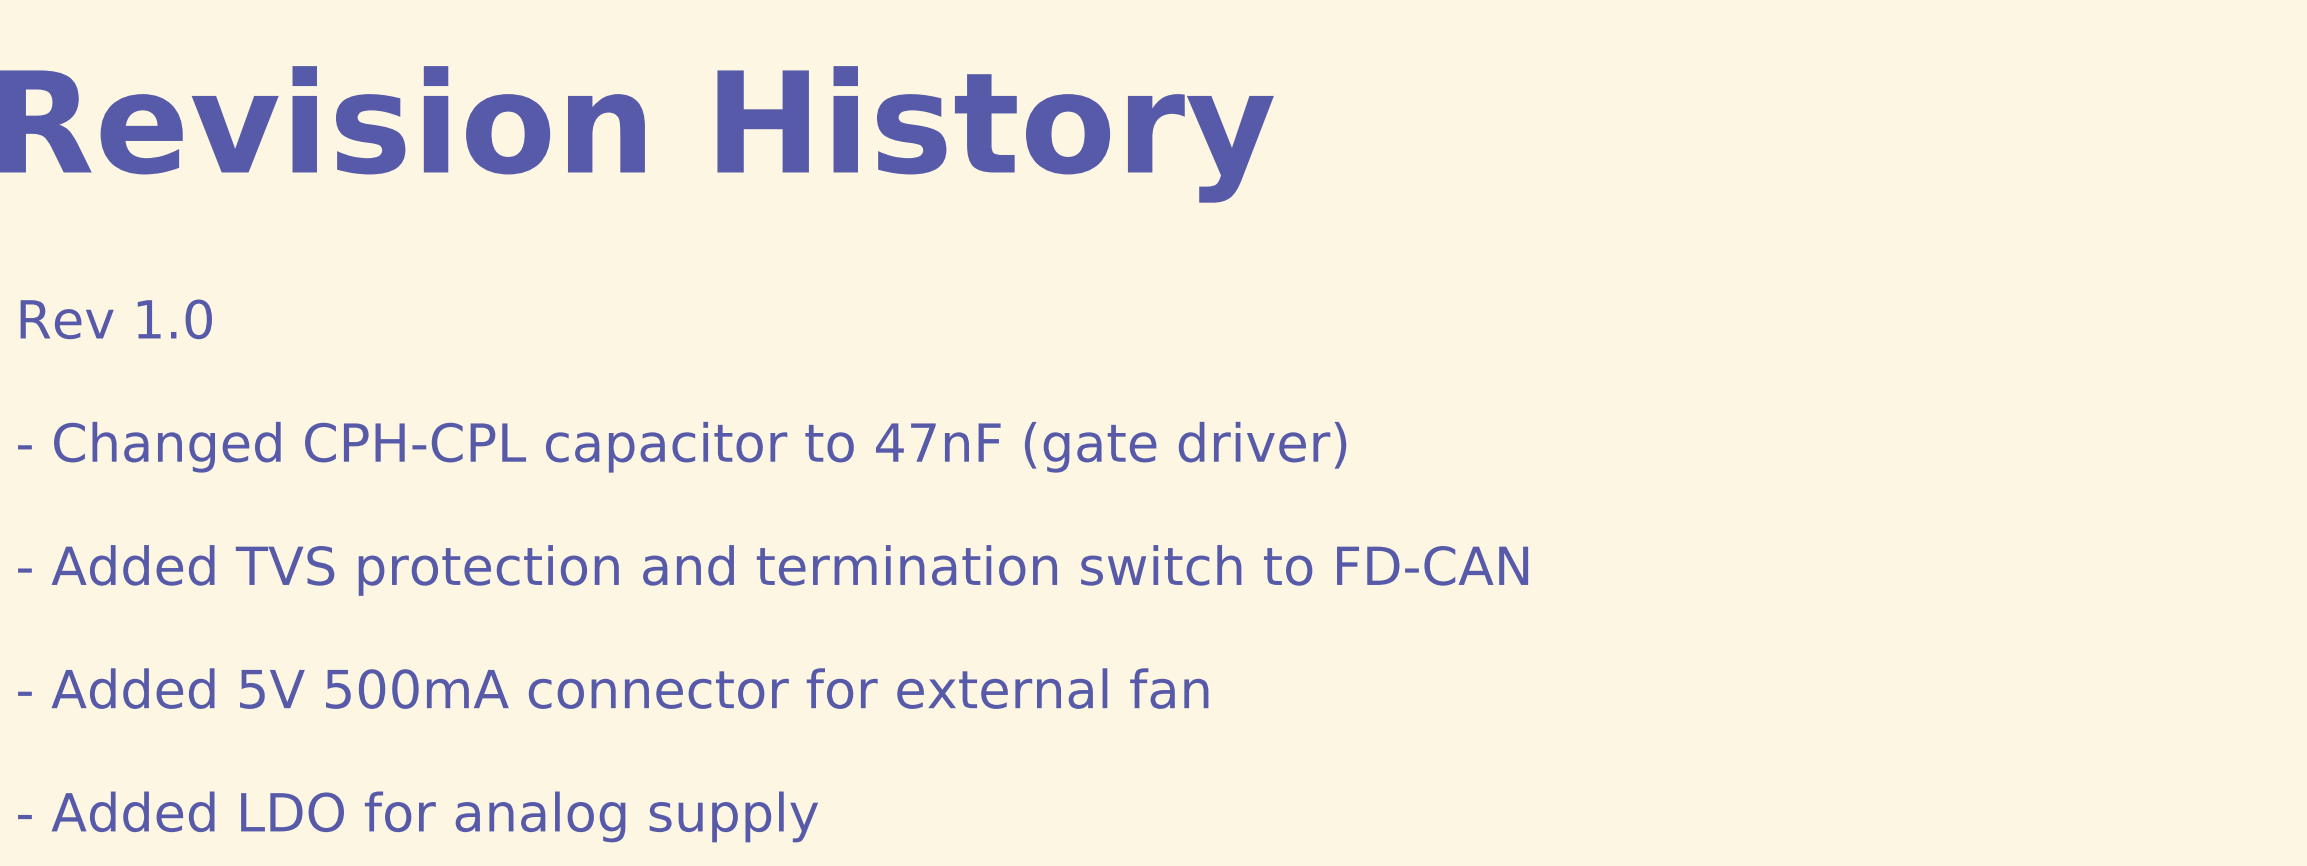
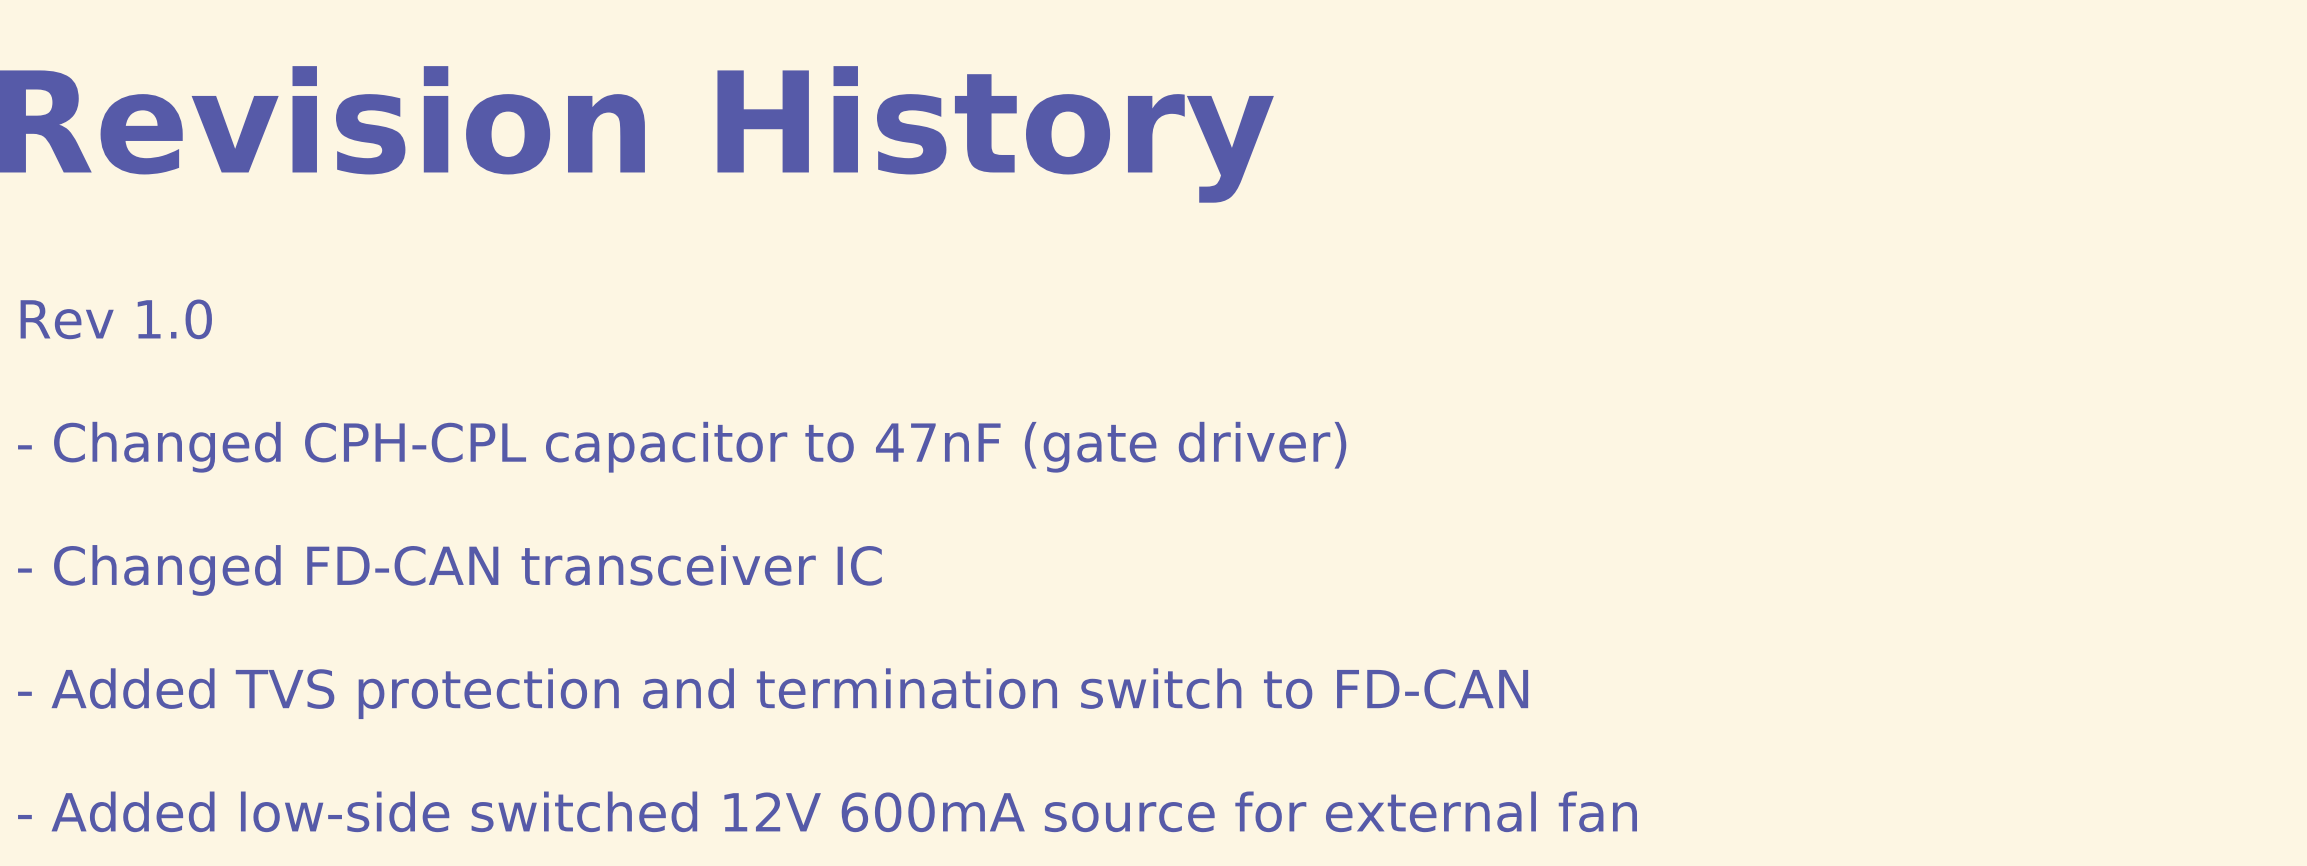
text: - Added TVS protection and termination switch to FD-CAN (773, 570) -> - Changed FD-CAN transceiver IC (449, 570)
text: - Added 5V 500mA connector for external fan (613, 688) -> - Added TVS protection and termination switch to FD-CAN (773, 693)
text: - Added LDO for analog supply (418, 816) -> - Added low-side switched 12V 600mA source for external fan (827, 811)

